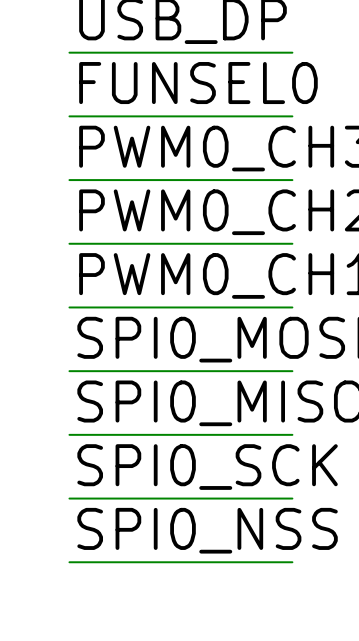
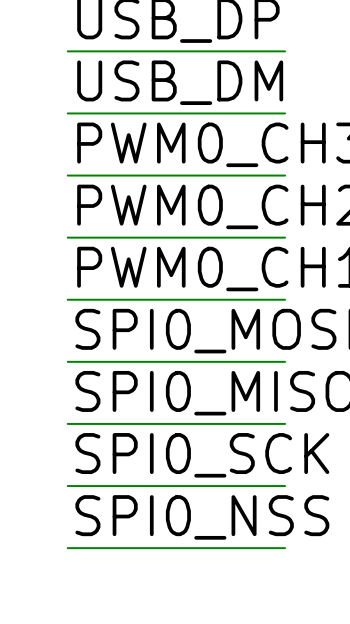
label: FUNSEL0 (198, 83) -> USB_DM (180, 82)

